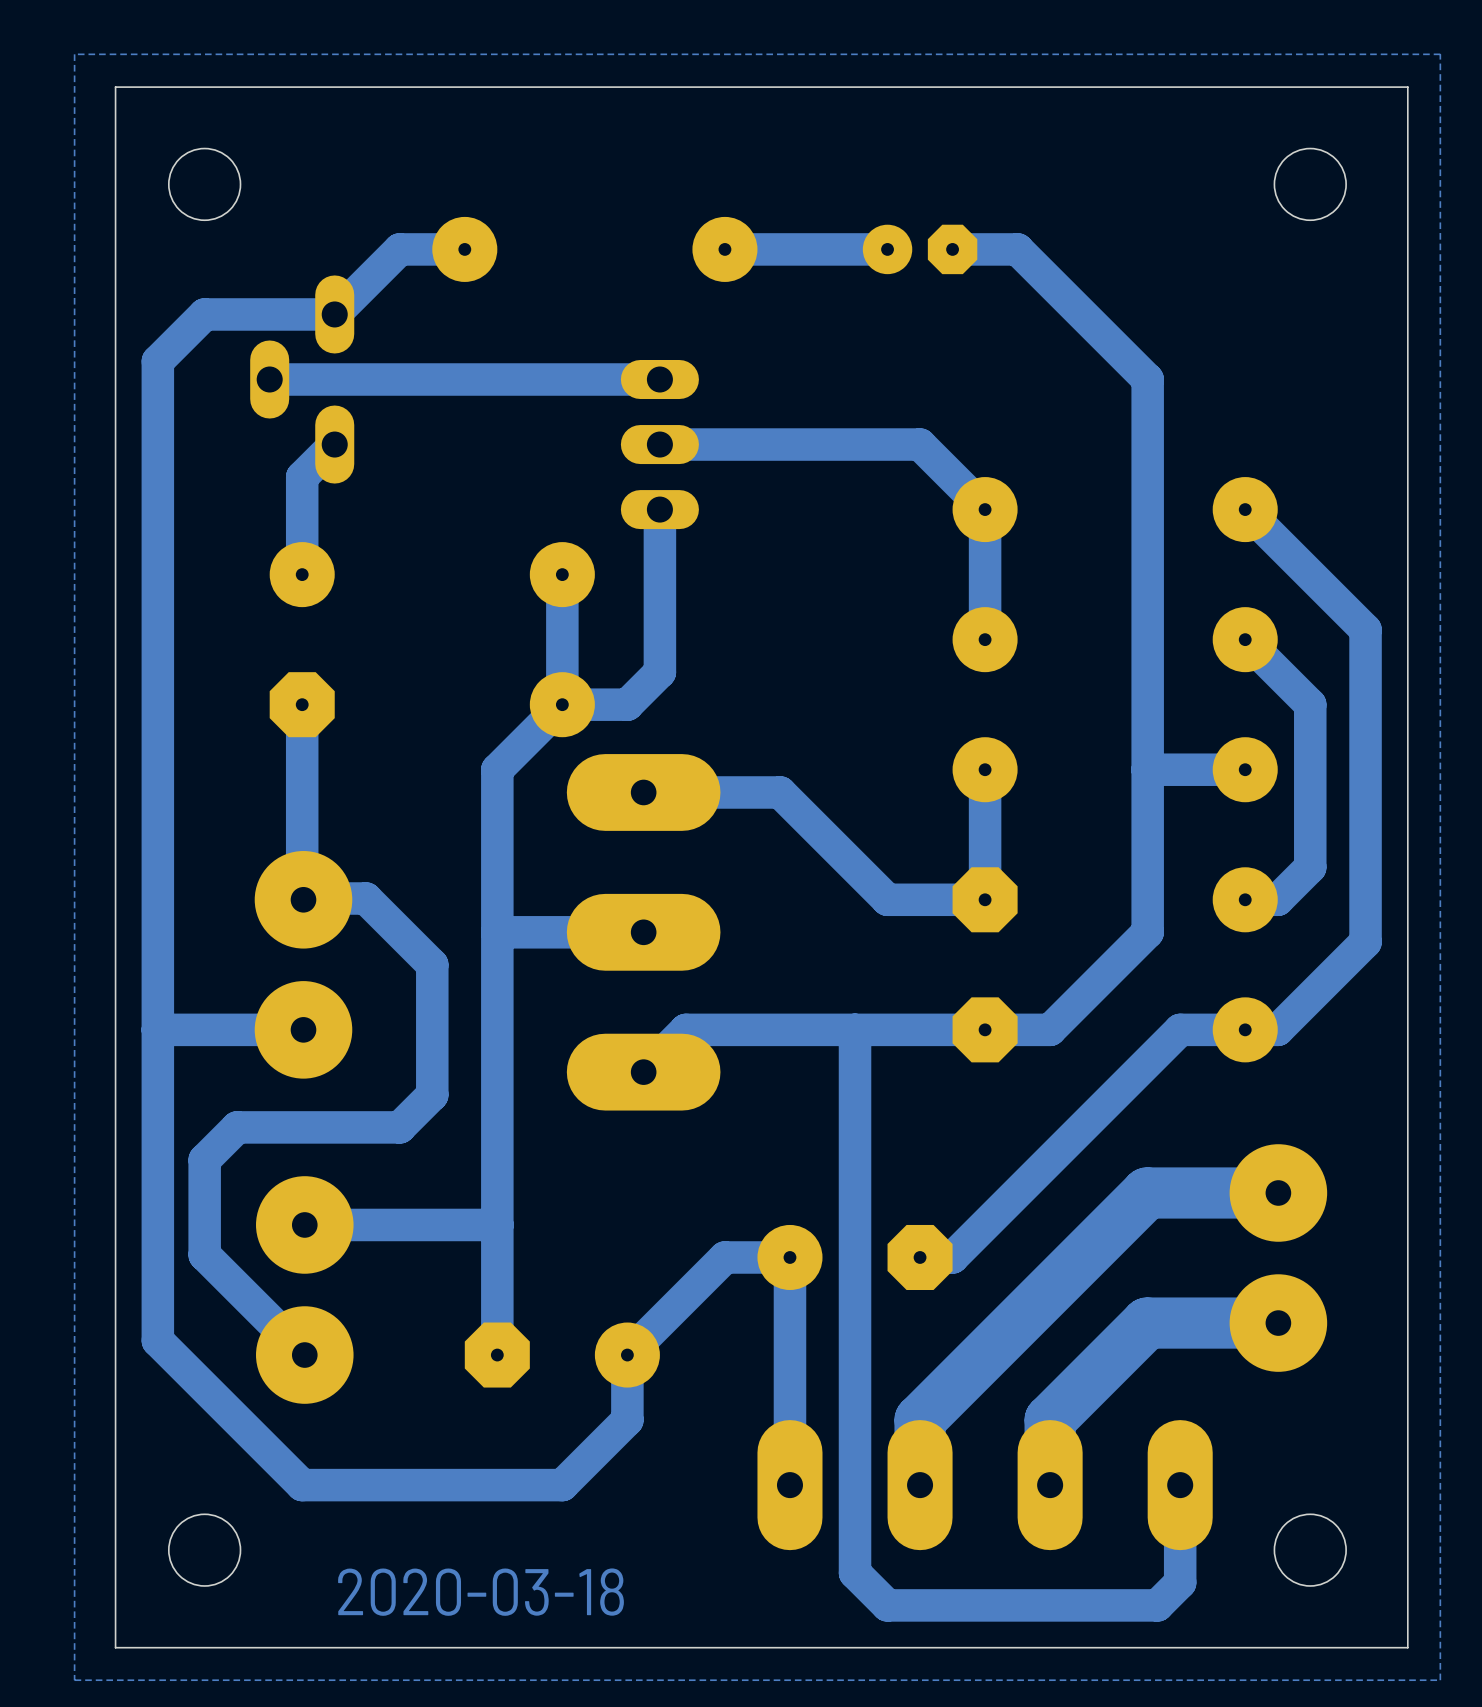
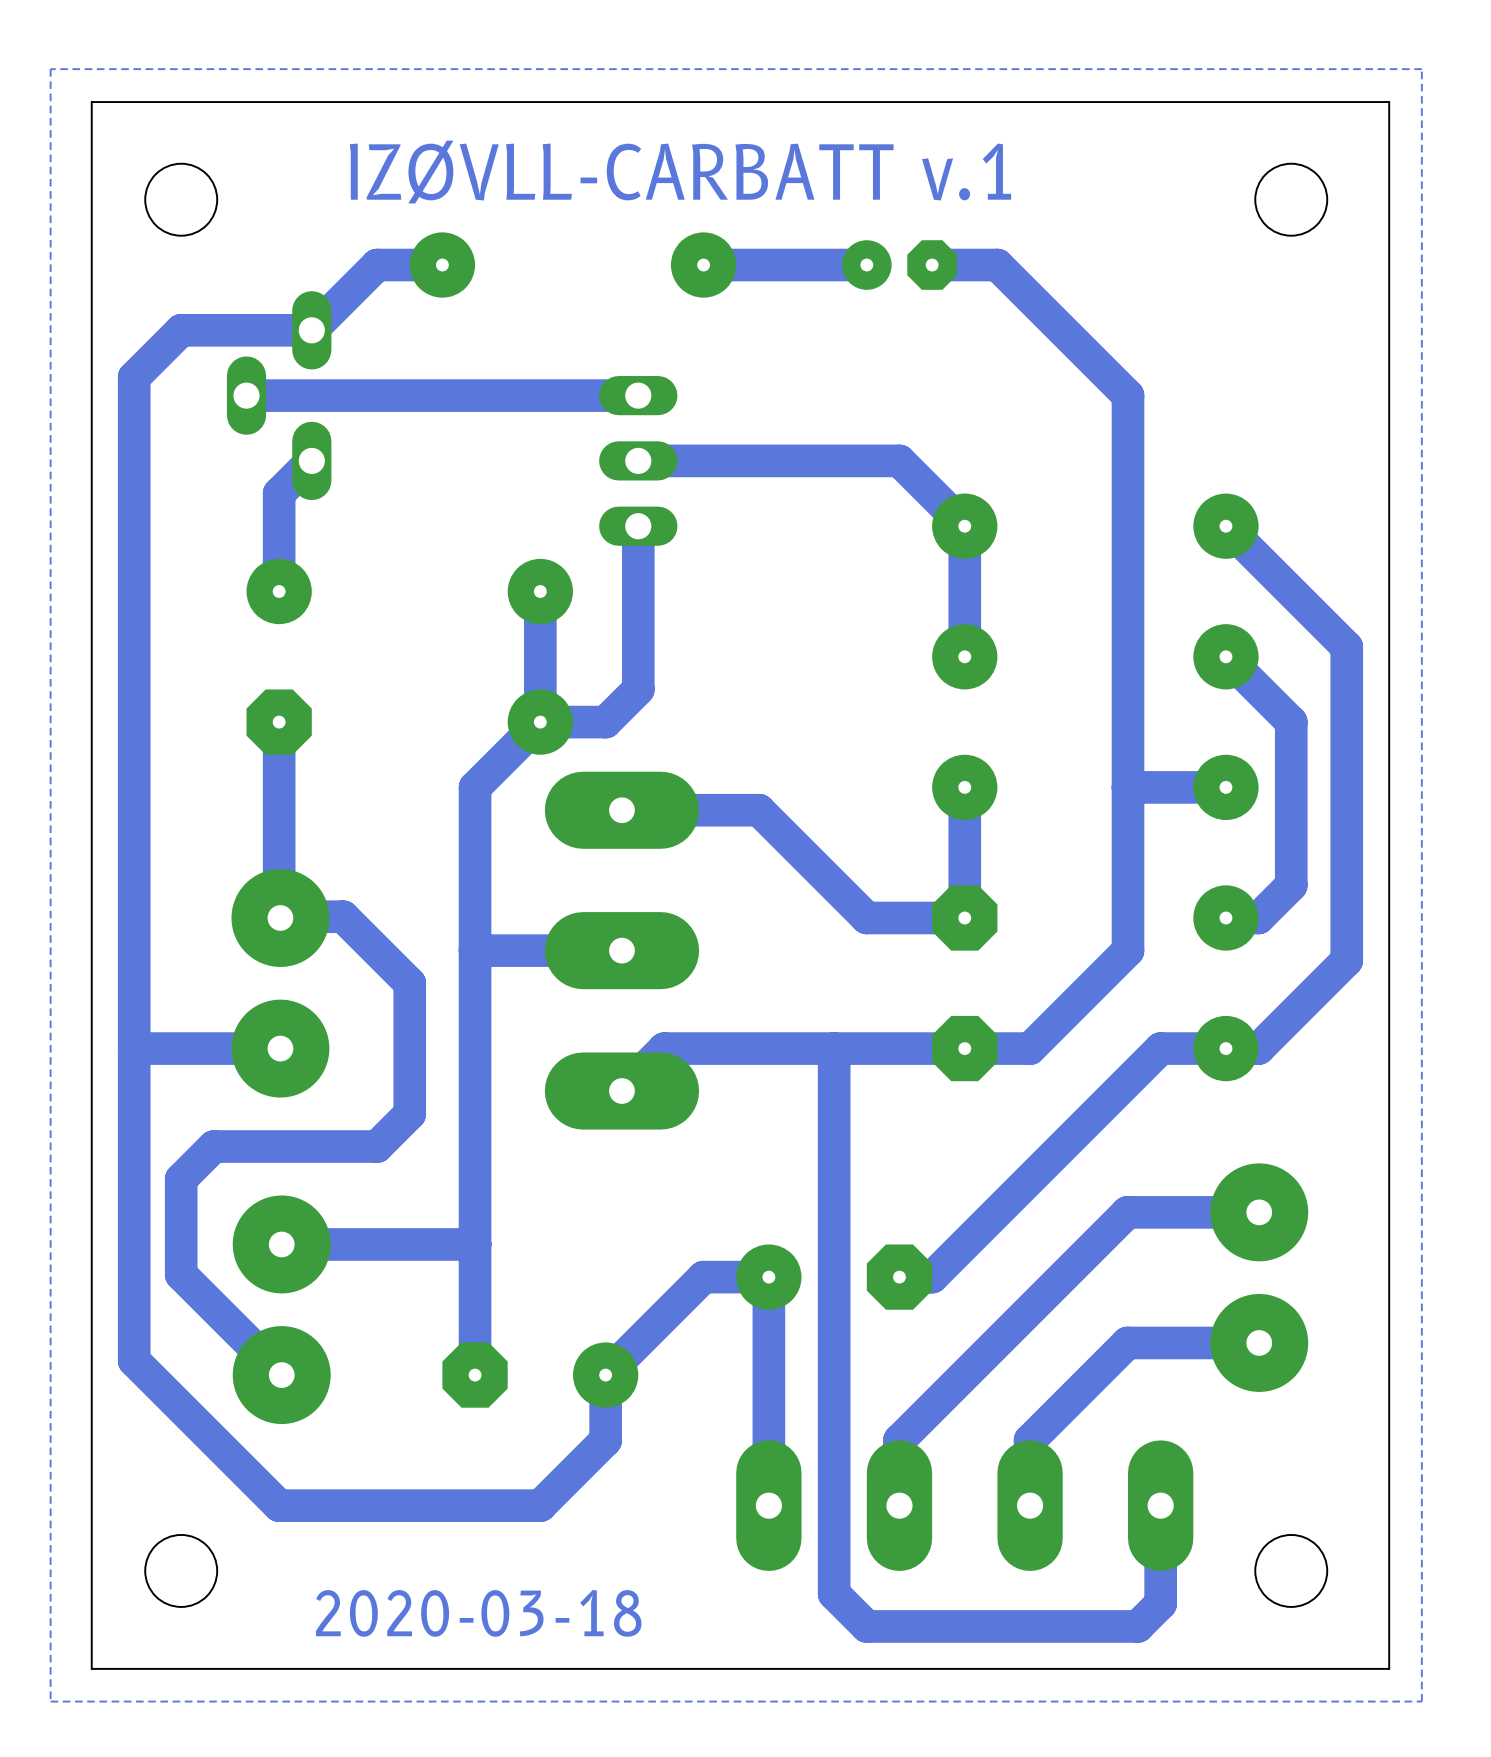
text: none -> IZØVLL-CARBATT v.1 (680, 172)
track width: thick (1278, 1192) (1147, 1192) (920, 1420) (920, 1485) -> thin (1259, 1212) (1127, 1212) (899, 1440) (899, 1505)
track width: thick (1278, 1323) (1147, 1323) (1050, 1420) (1050, 1485) -> thin (1259, 1342) (1127, 1342) (1030, 1440) (1030, 1505)

